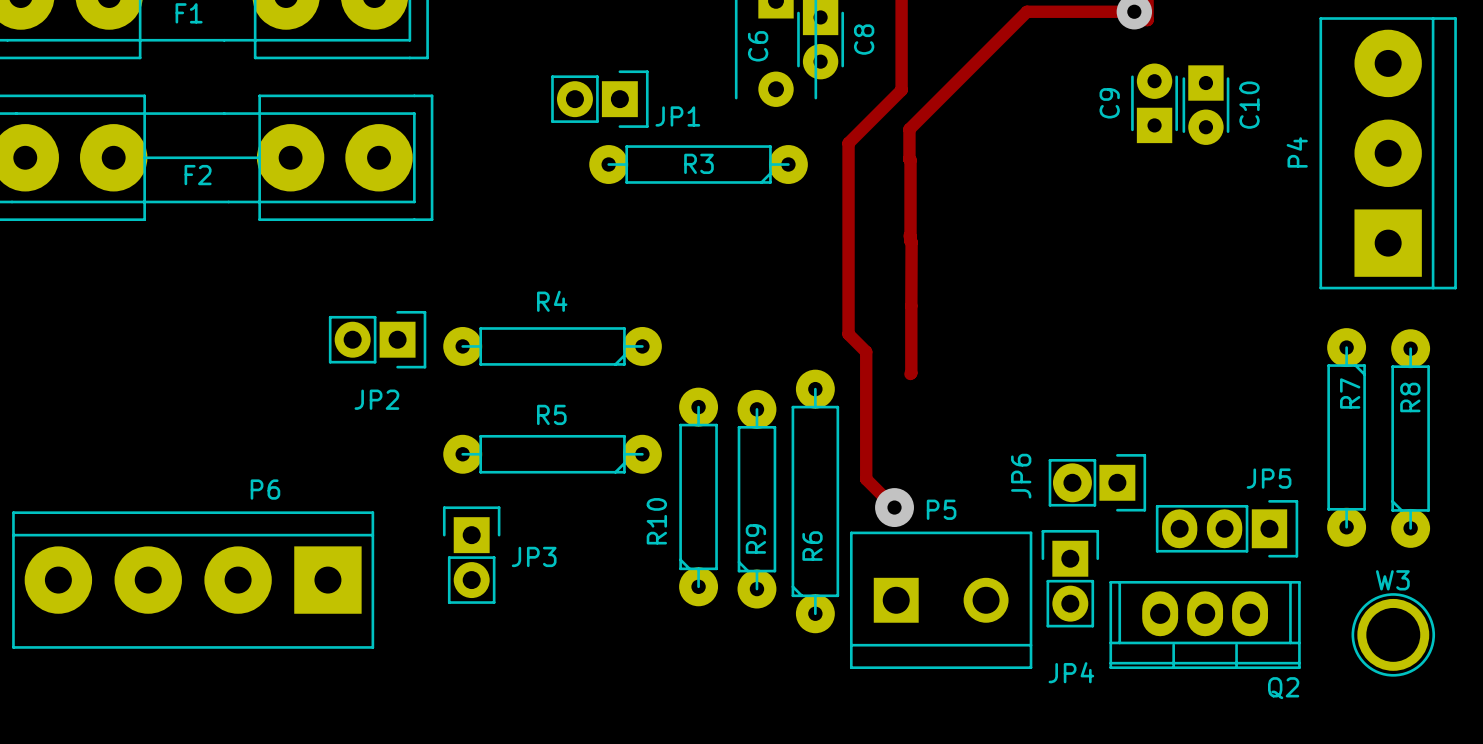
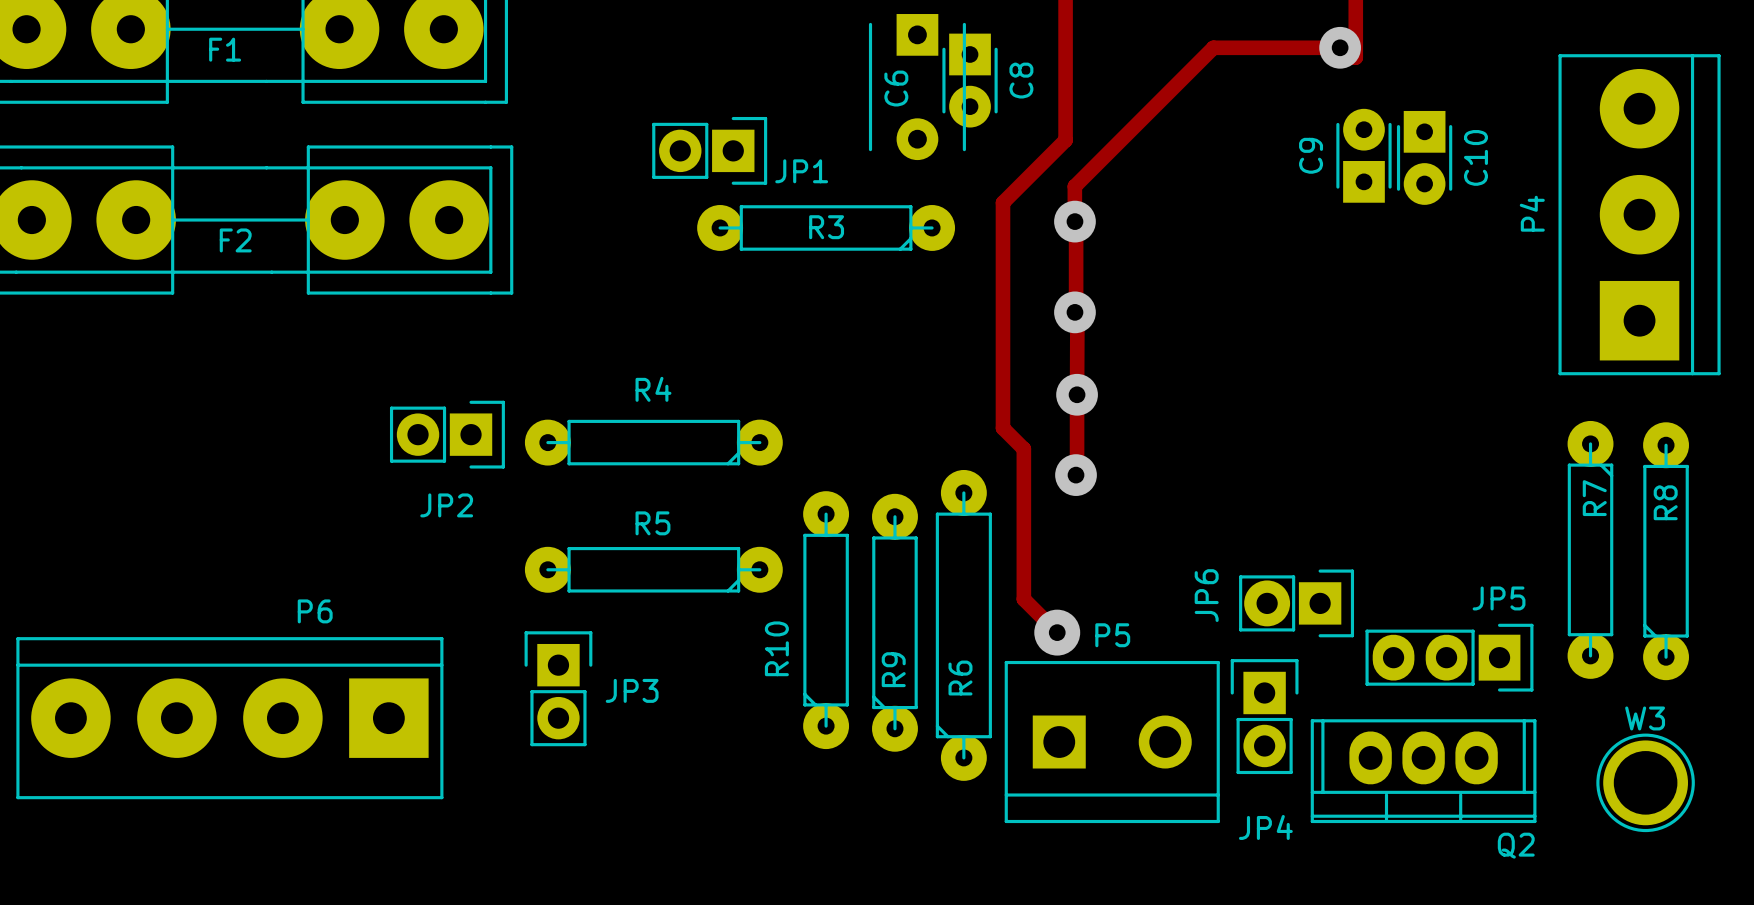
via: none -> (1074, 221)
via: none -> (1074, 312)
via: none -> (1077, 394)
via: none -> (1076, 475)

